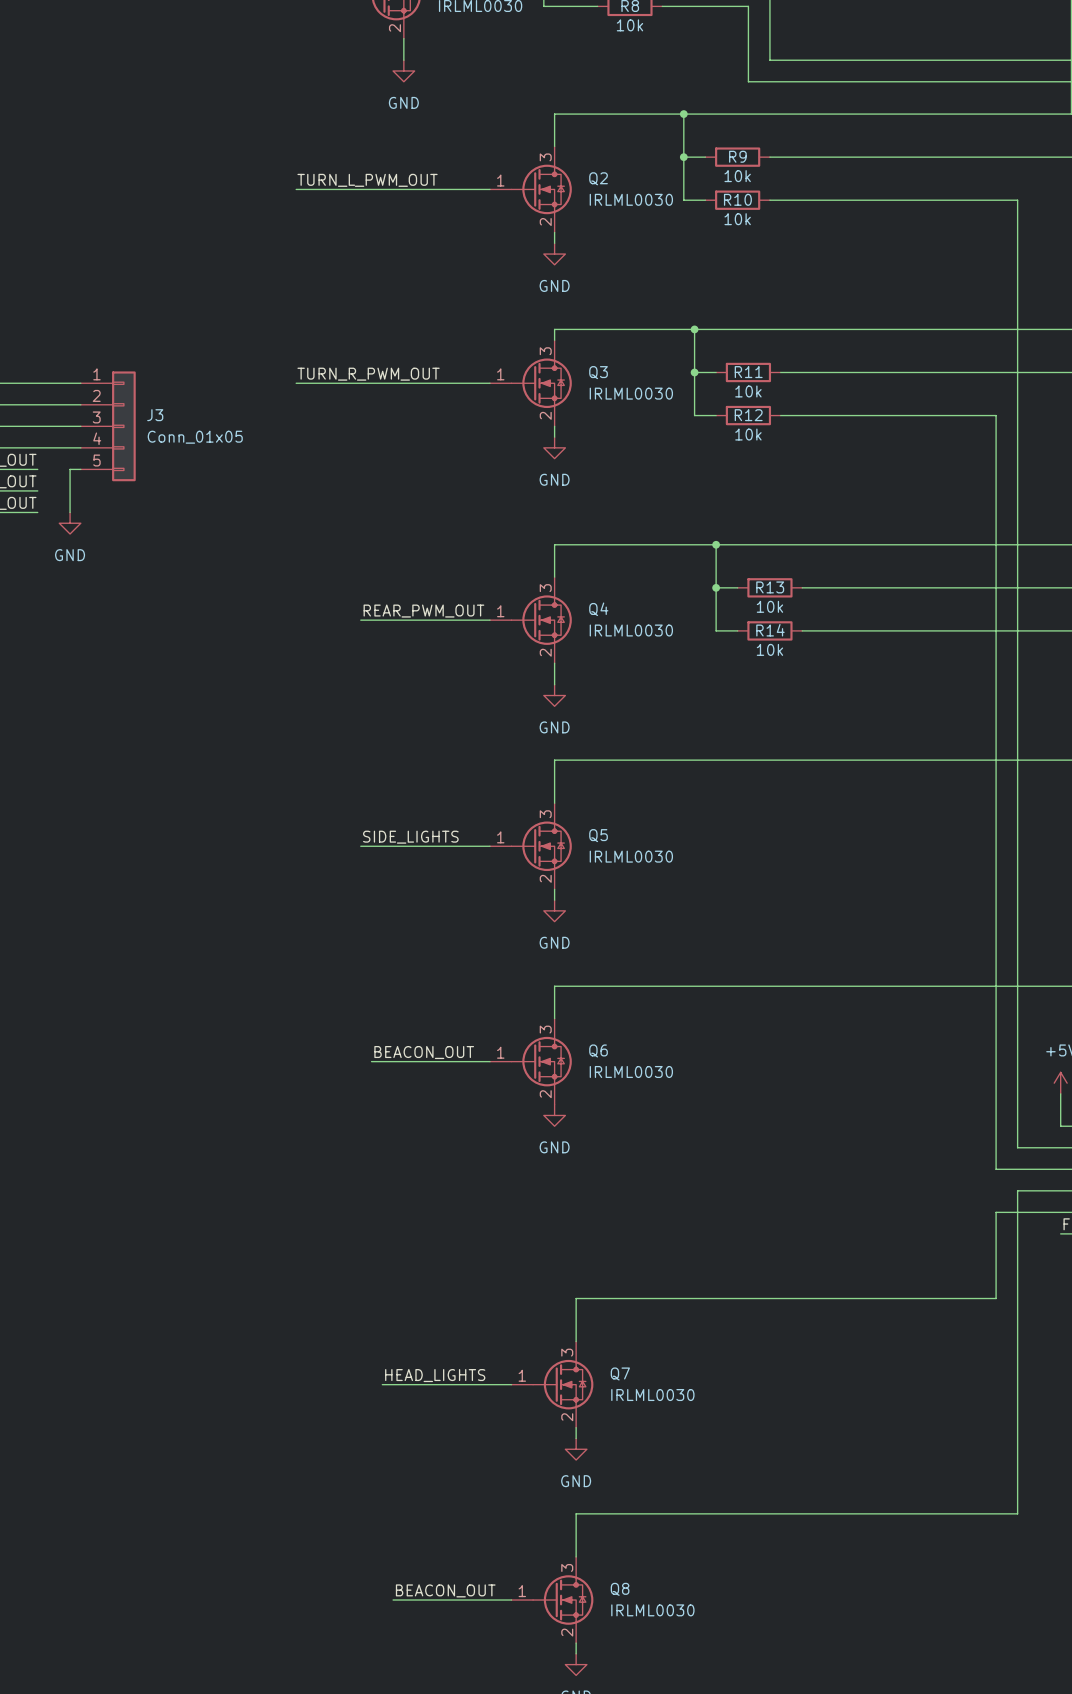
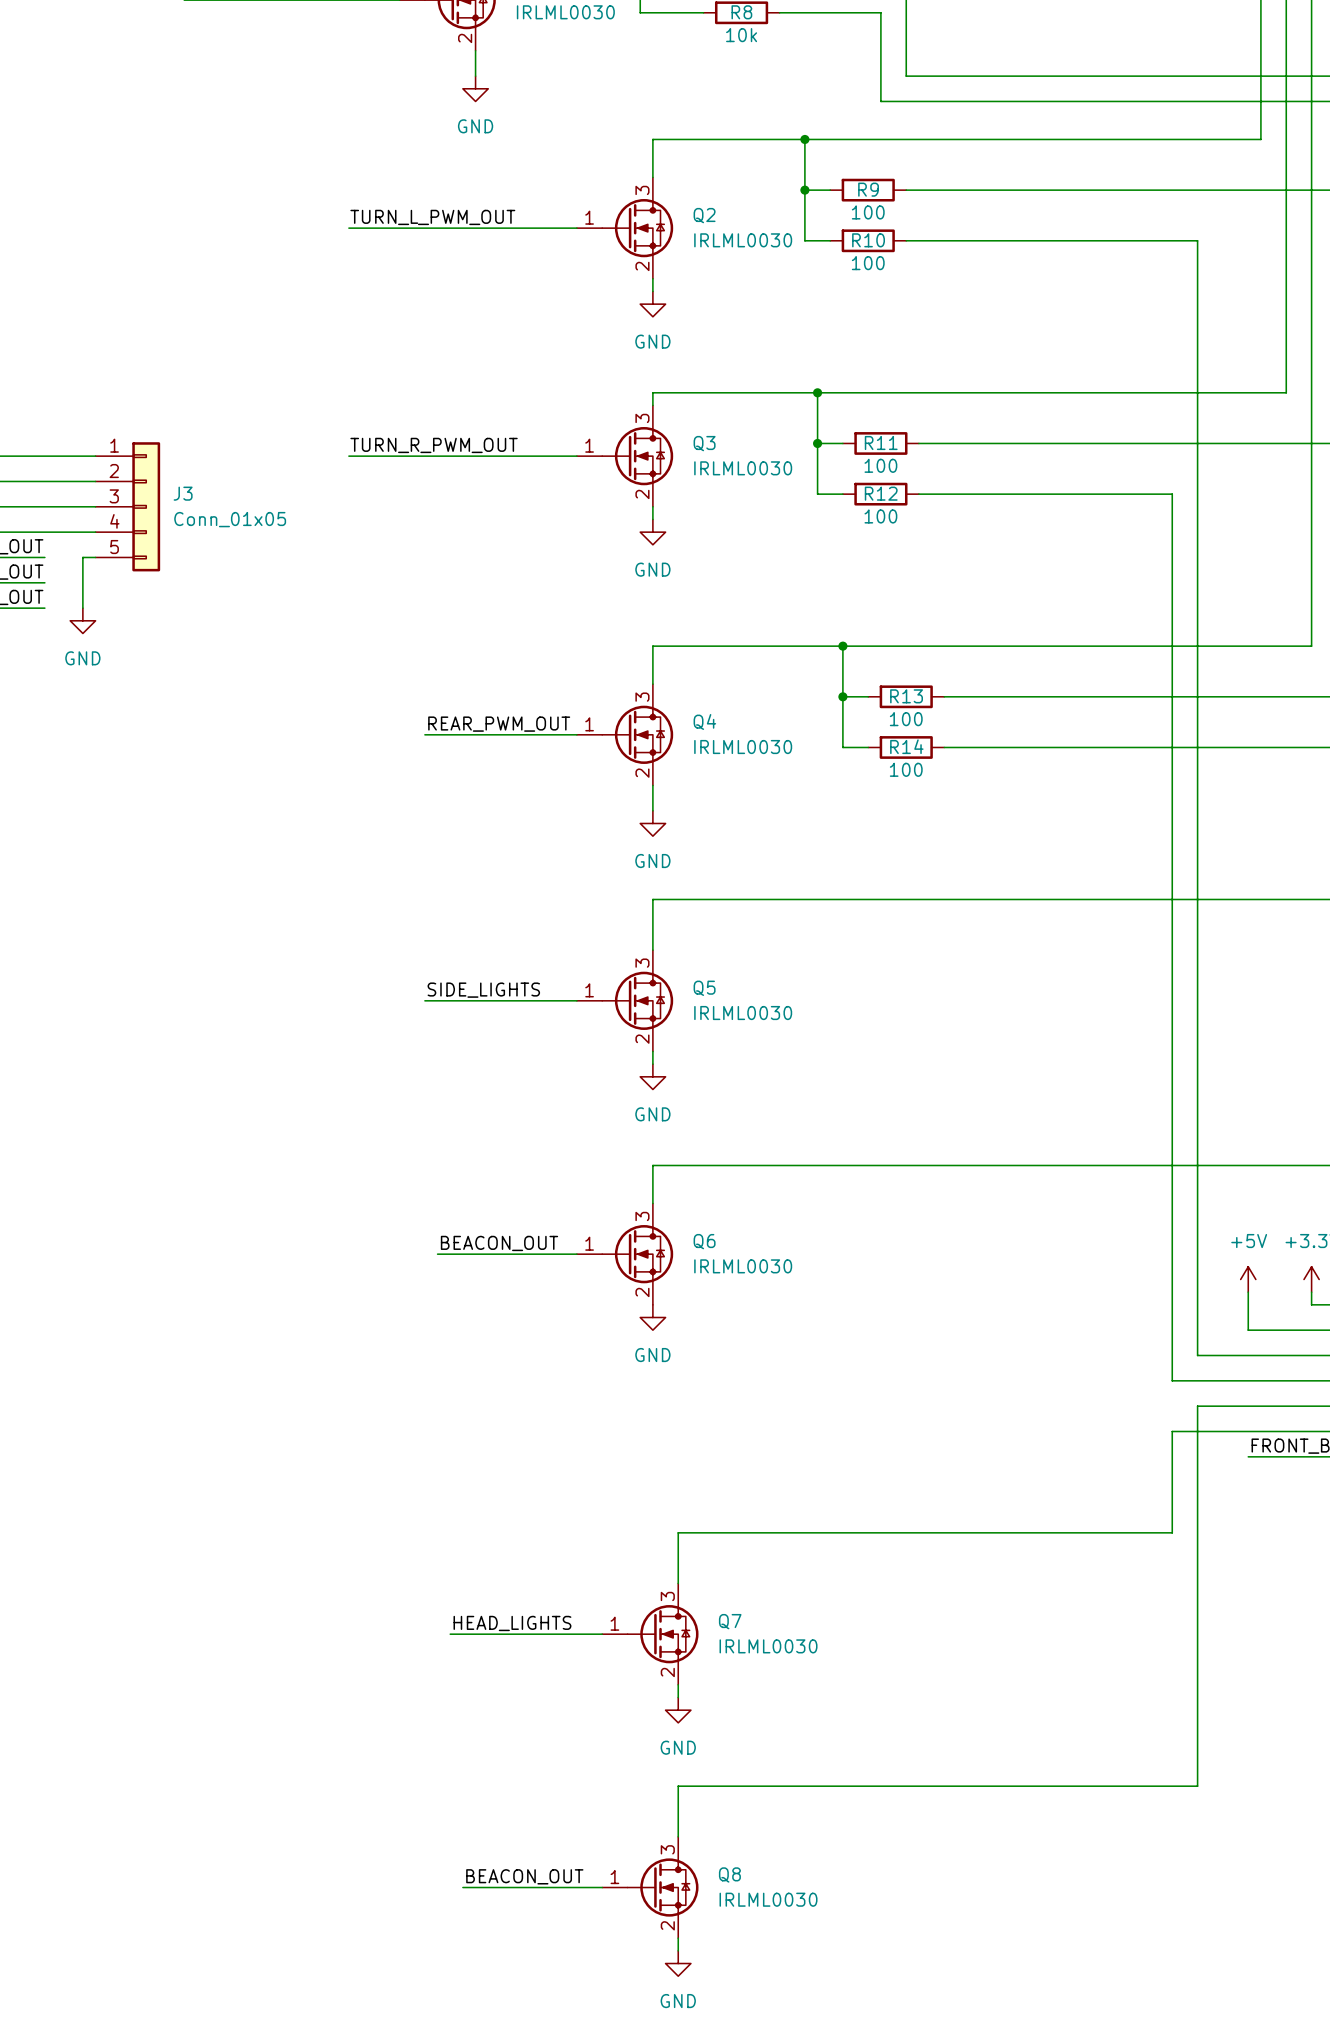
R9 value: 10k (737, 176) -> 100 (868, 212)
R10 value: 10k (737, 219) -> 100 (868, 263)
R11 value: 10k (748, 391) -> 100 (880, 465)
R12 value: 10k (748, 434) -> 100 (880, 516)
R13 value: 10k (769, 606) -> 100 (906, 719)
R14 value: 10k (769, 649) -> 100 (906, 769)

